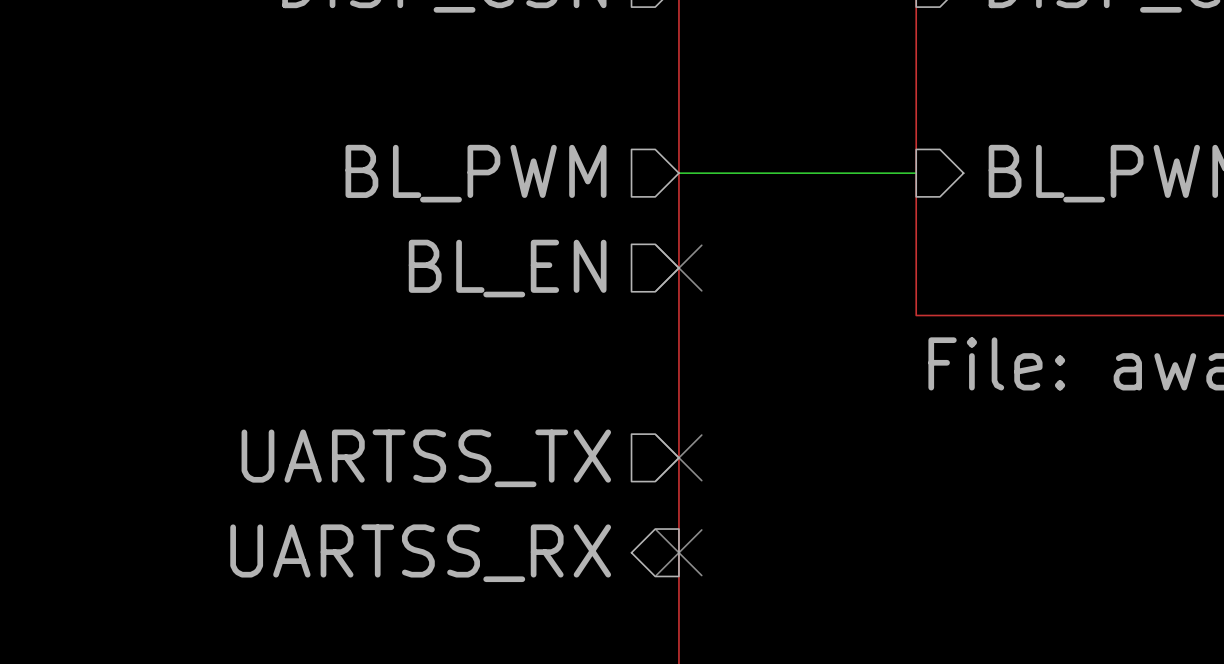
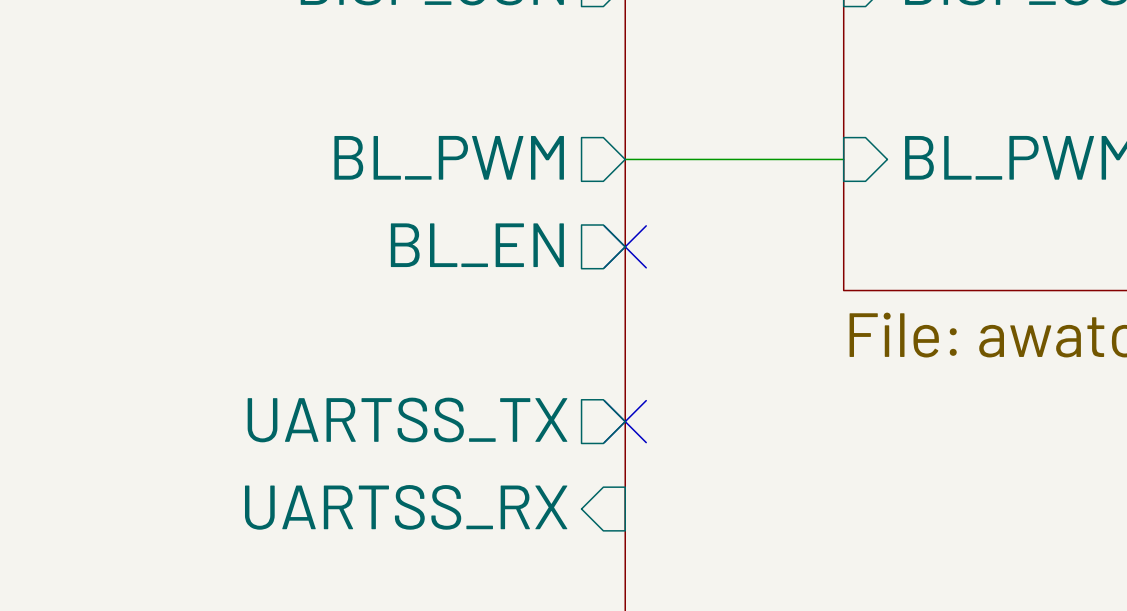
no-connect mark: (678, 552) -> none

